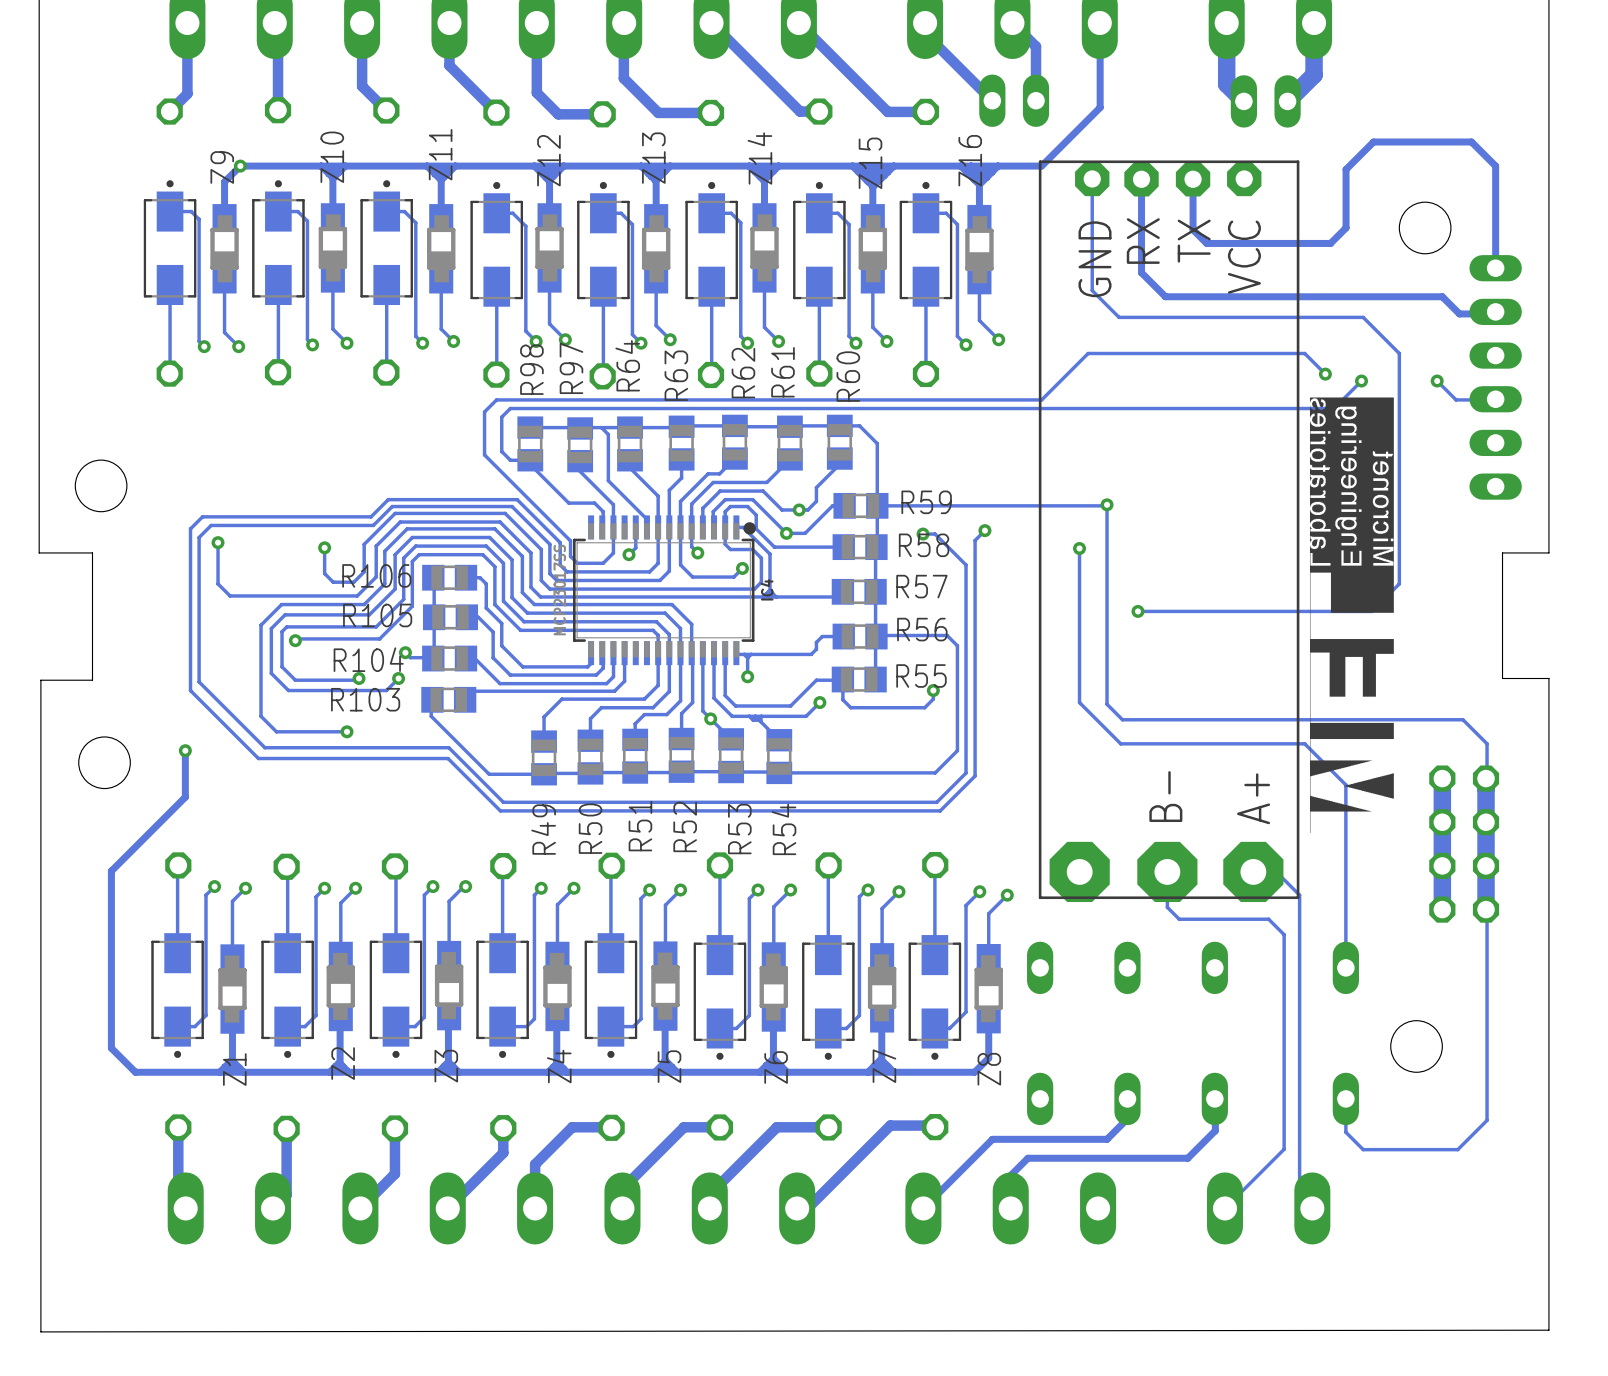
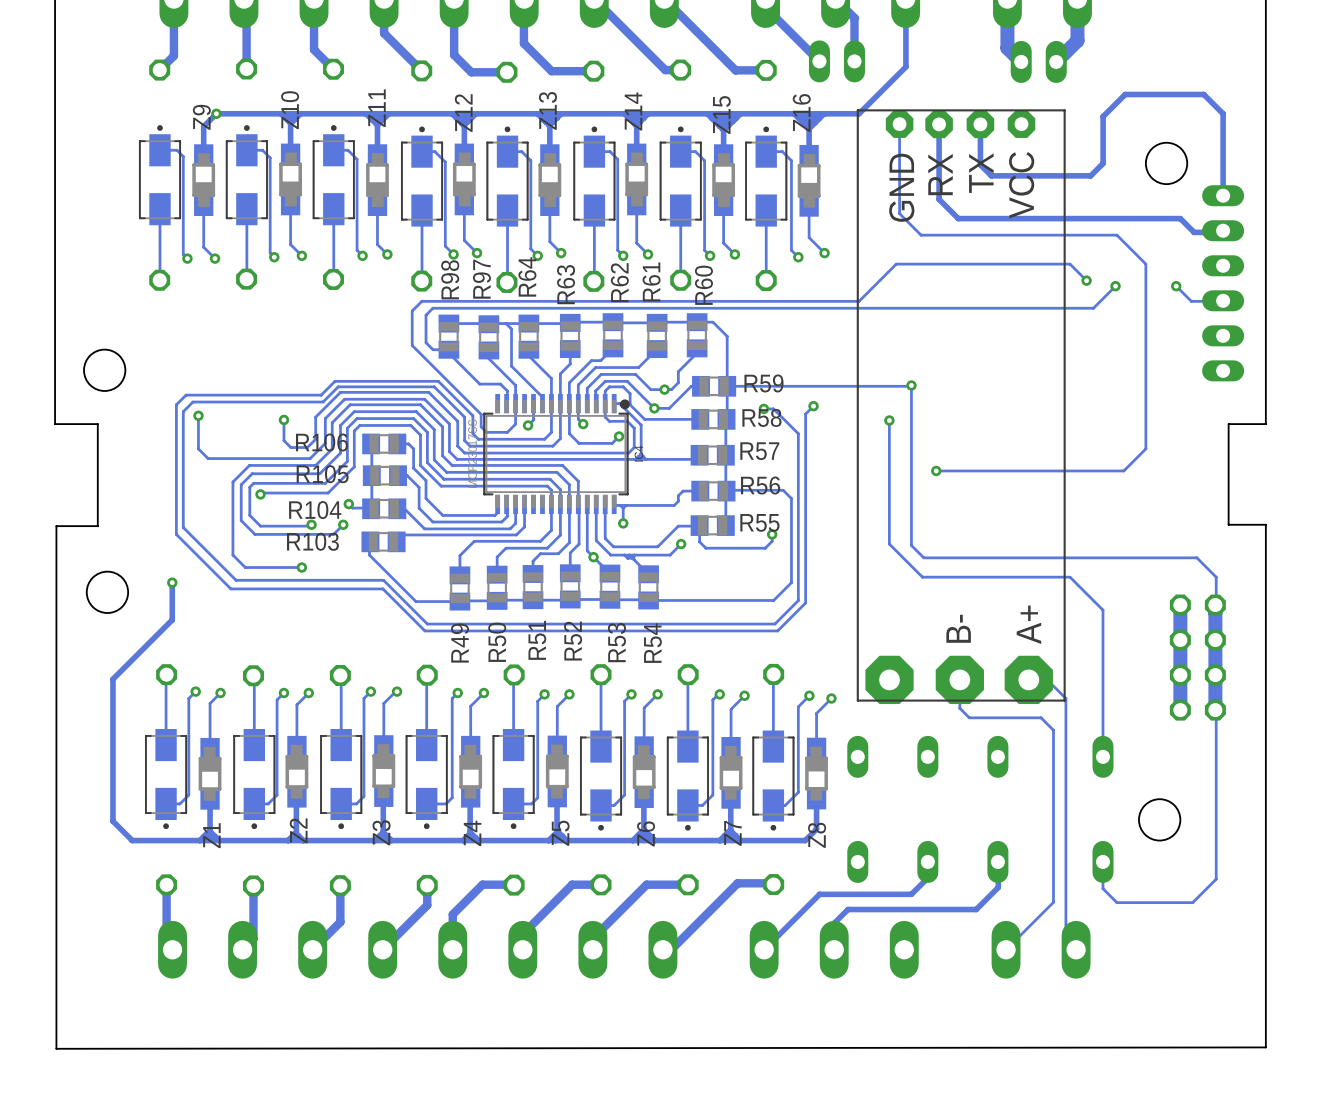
drawing: [1309, 397, 1394, 833] -> none

